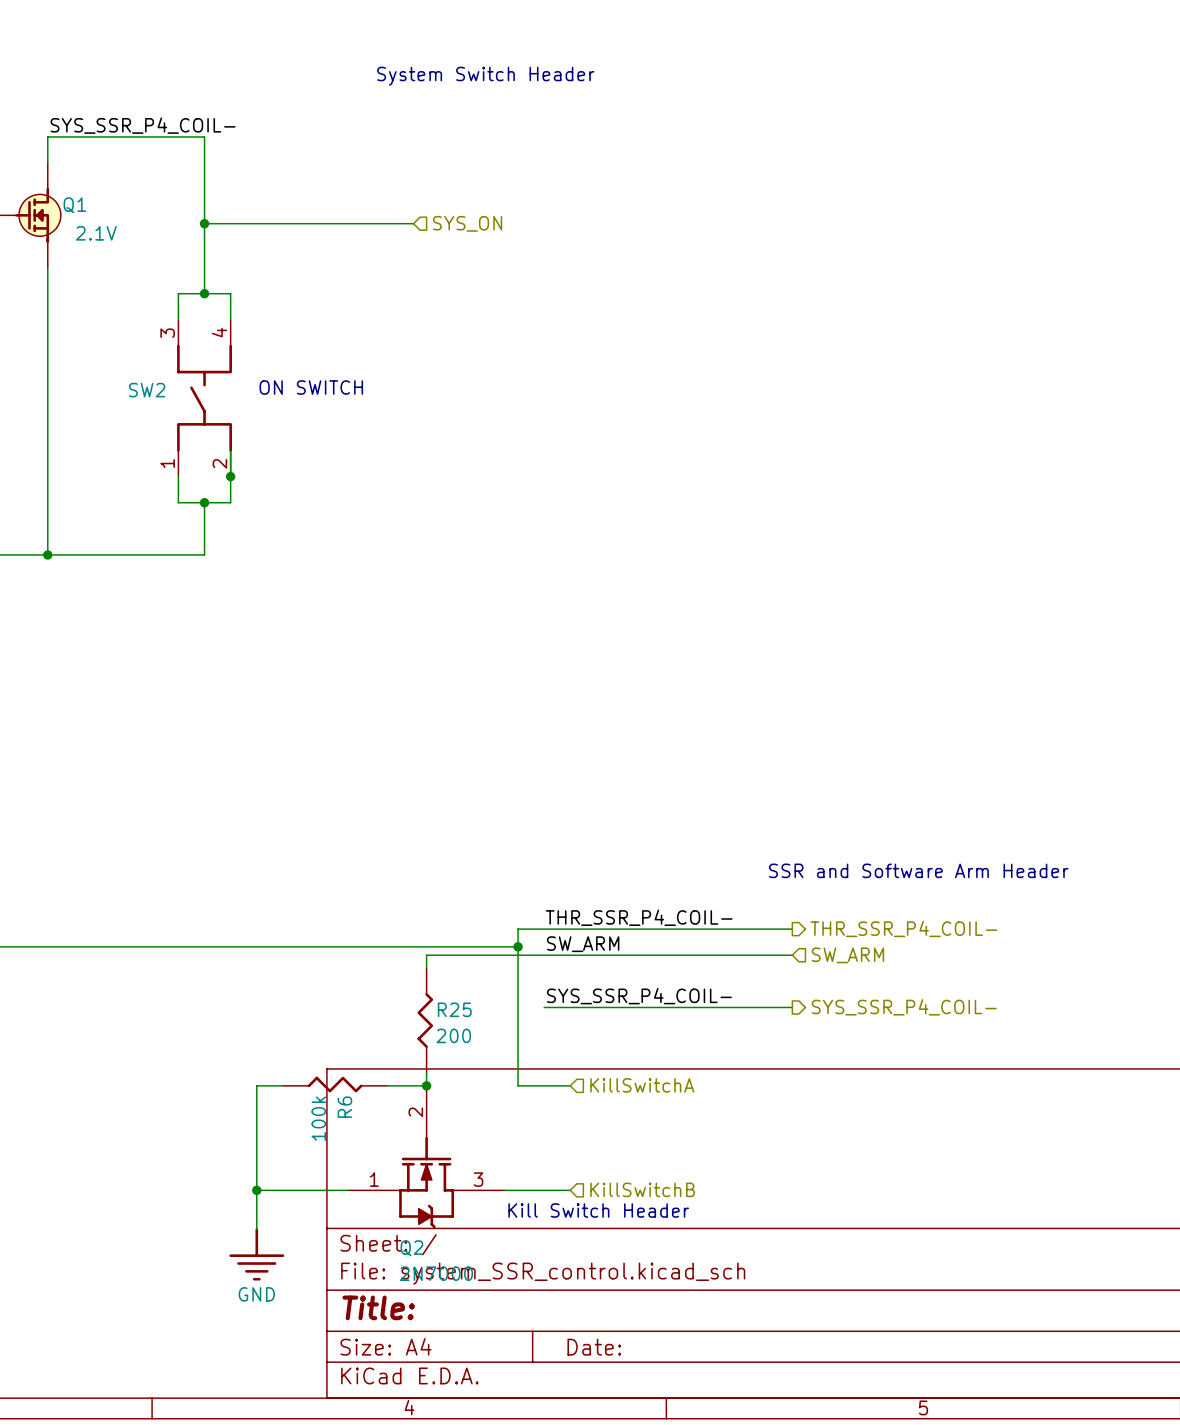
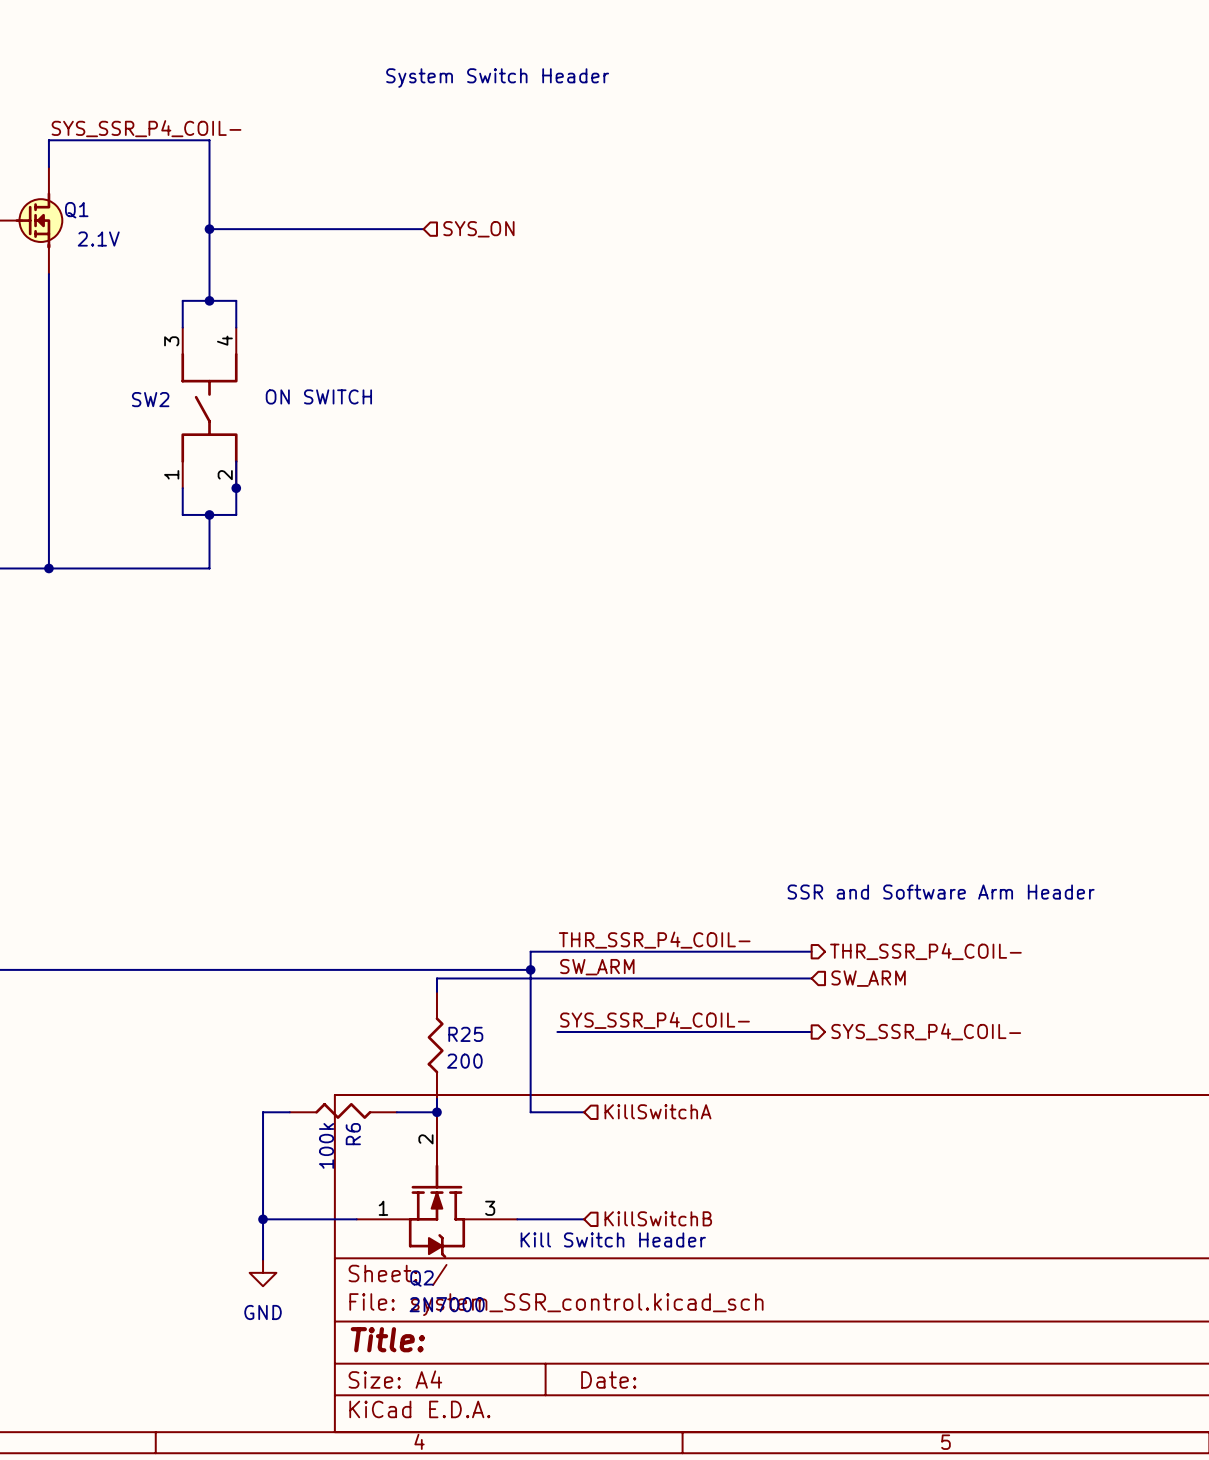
power symbol: none -> GND (263, 1272)
power symbol: GND (256, 1254) -> none

